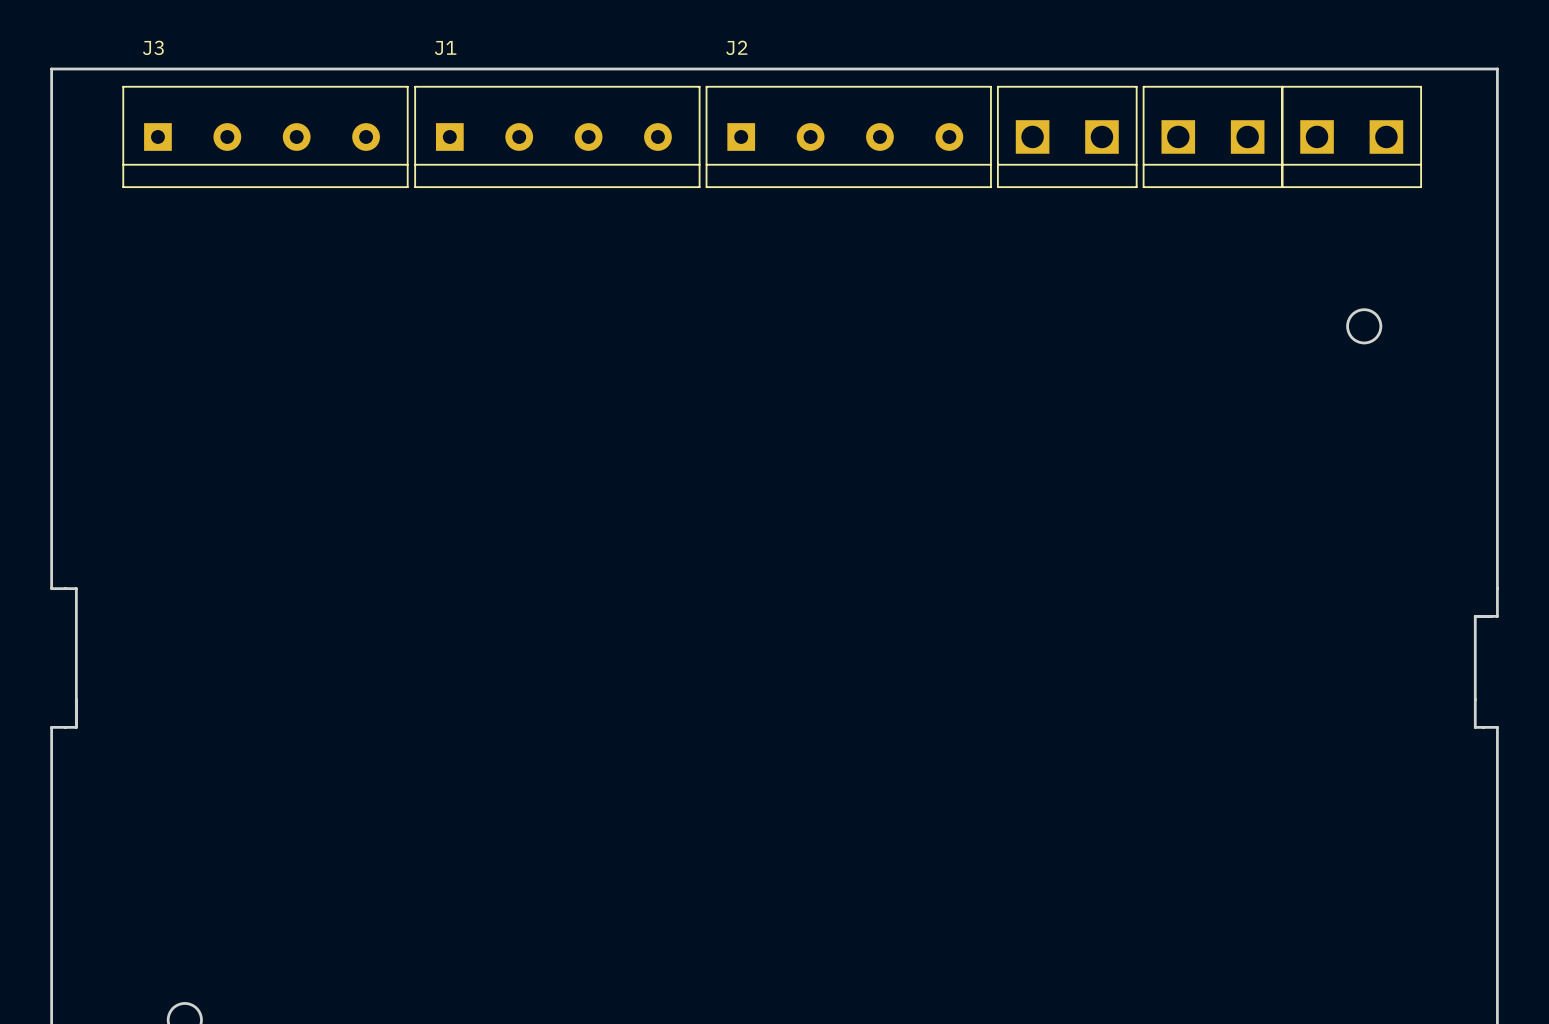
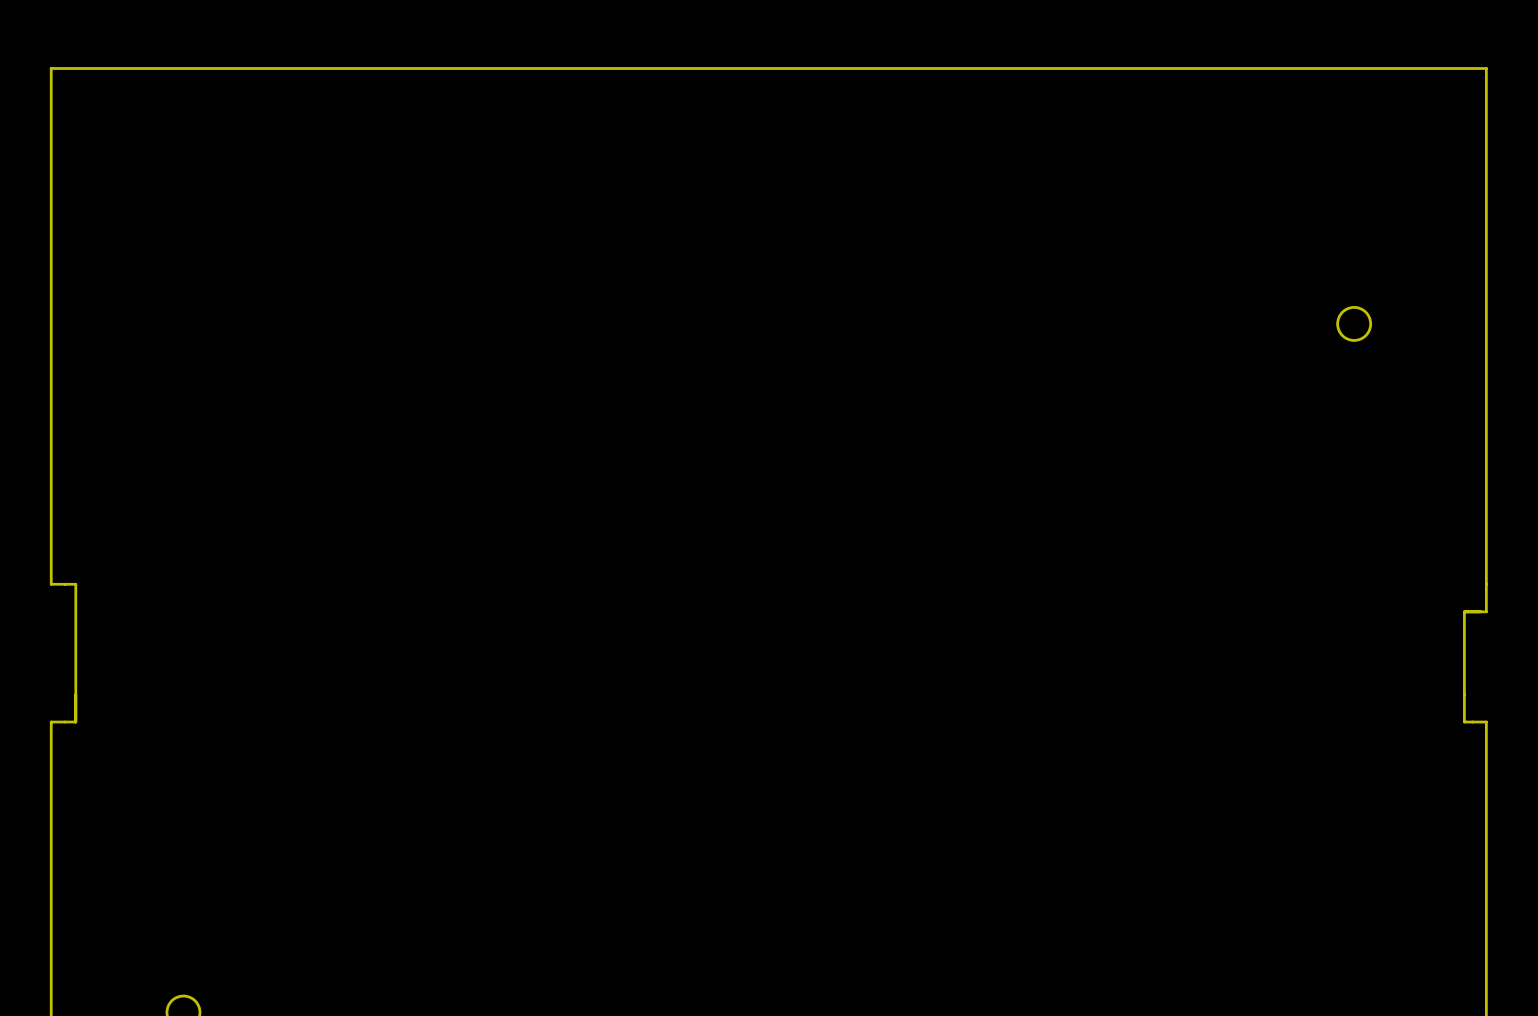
J3: (265, 136) -> none
J1: (557, 136) -> none
J2: (848, 136) -> none
part: (1067, 136) -> none
part: (1212, 136) -> none
part: (1351, 136) -> none

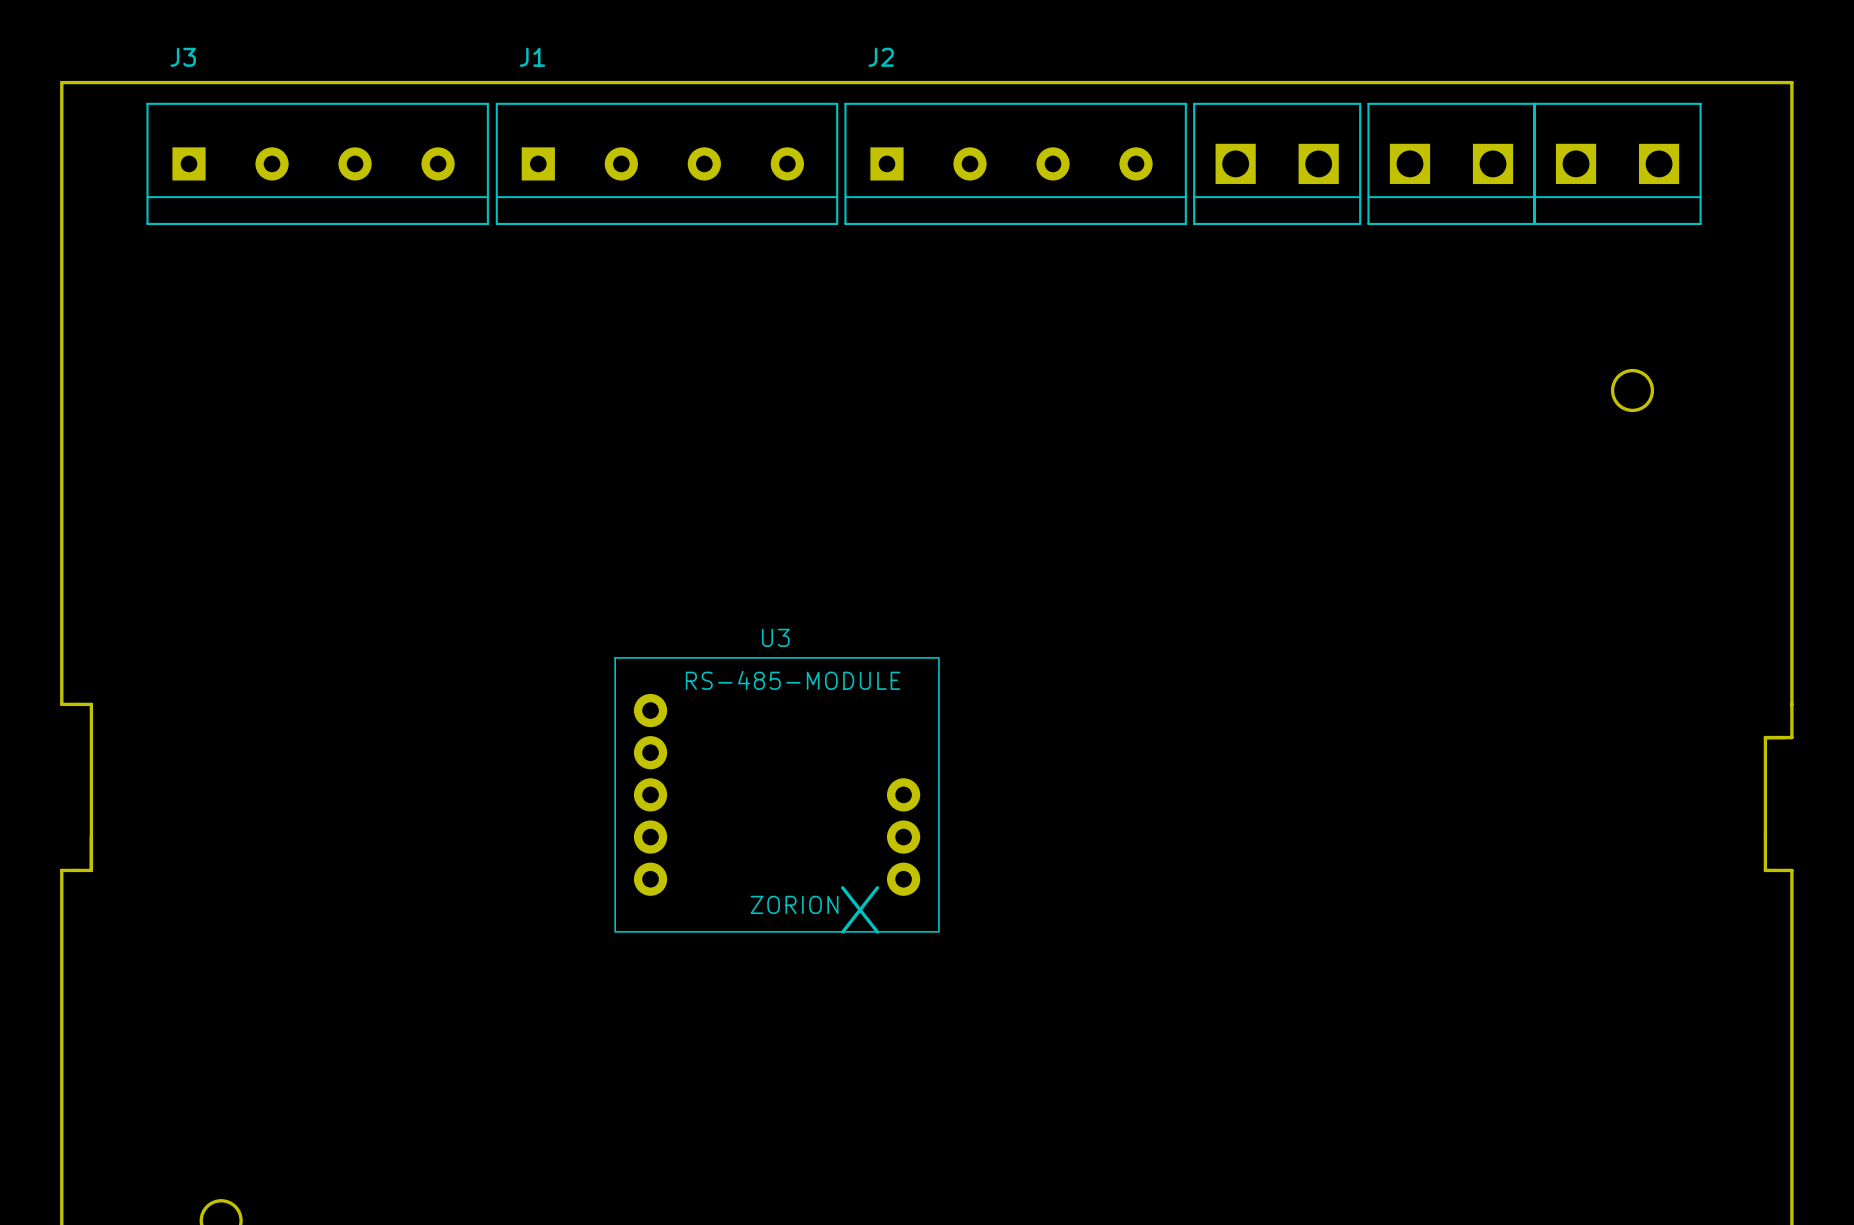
J3: none -> (317, 163)
J1: none -> (666, 163)
J2: none -> (1015, 163)
part: none -> (1277, 163)
part: none -> (1451, 163)
part: none -> (1617, 163)
U3: none -> (777, 794)

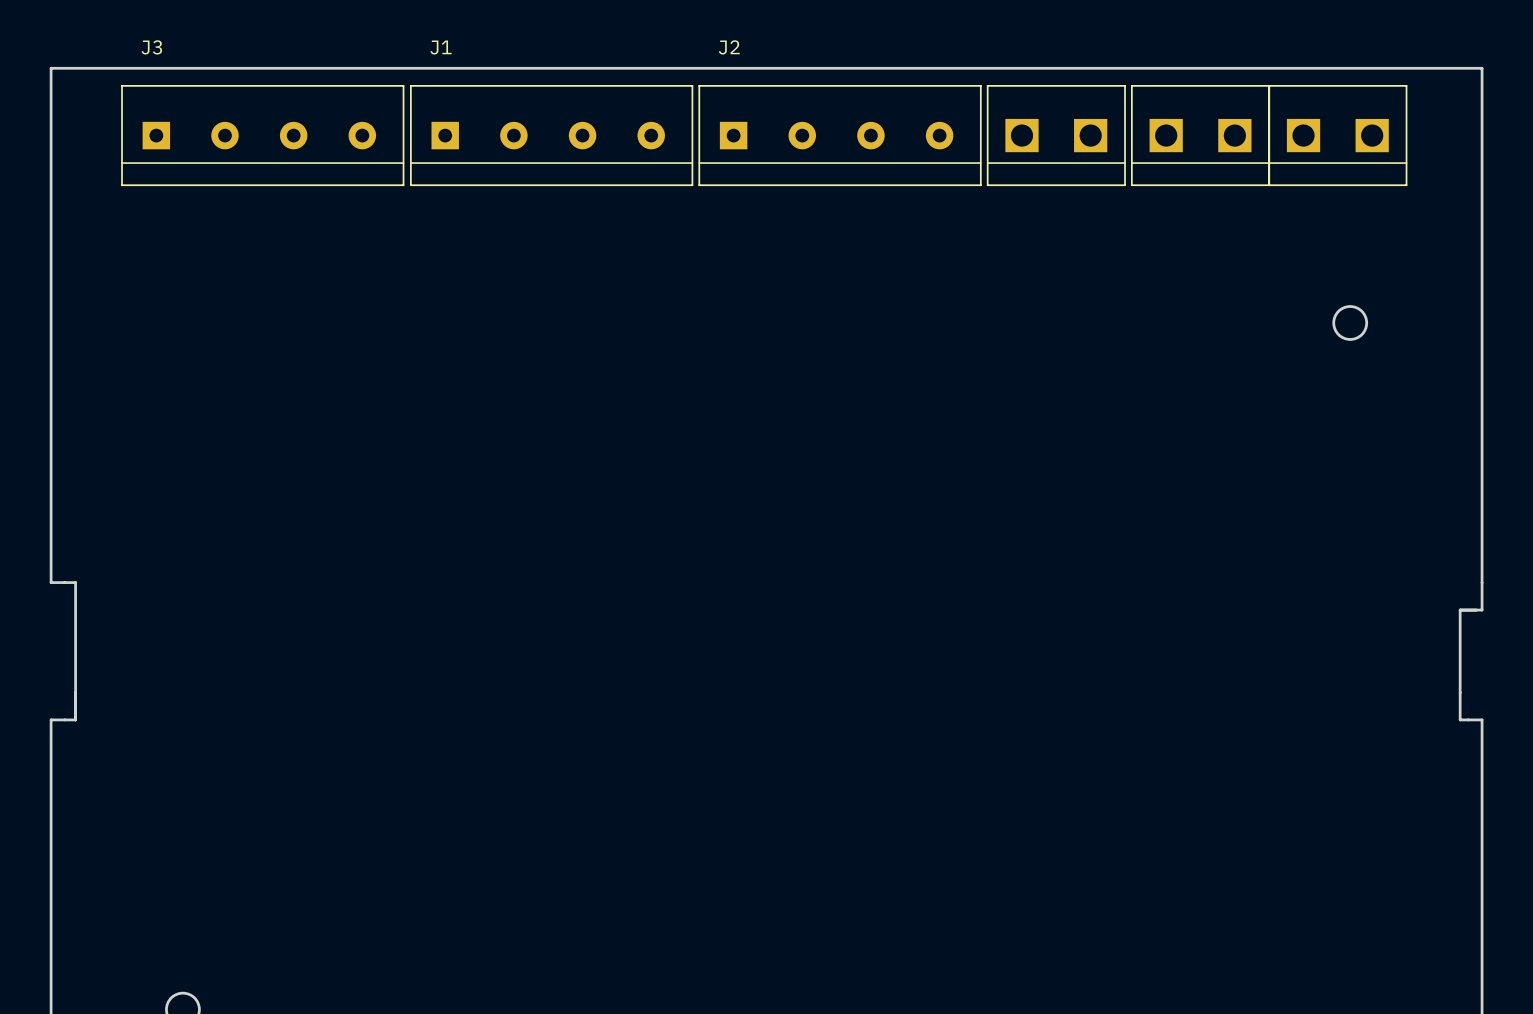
U3: (777, 794) -> none

